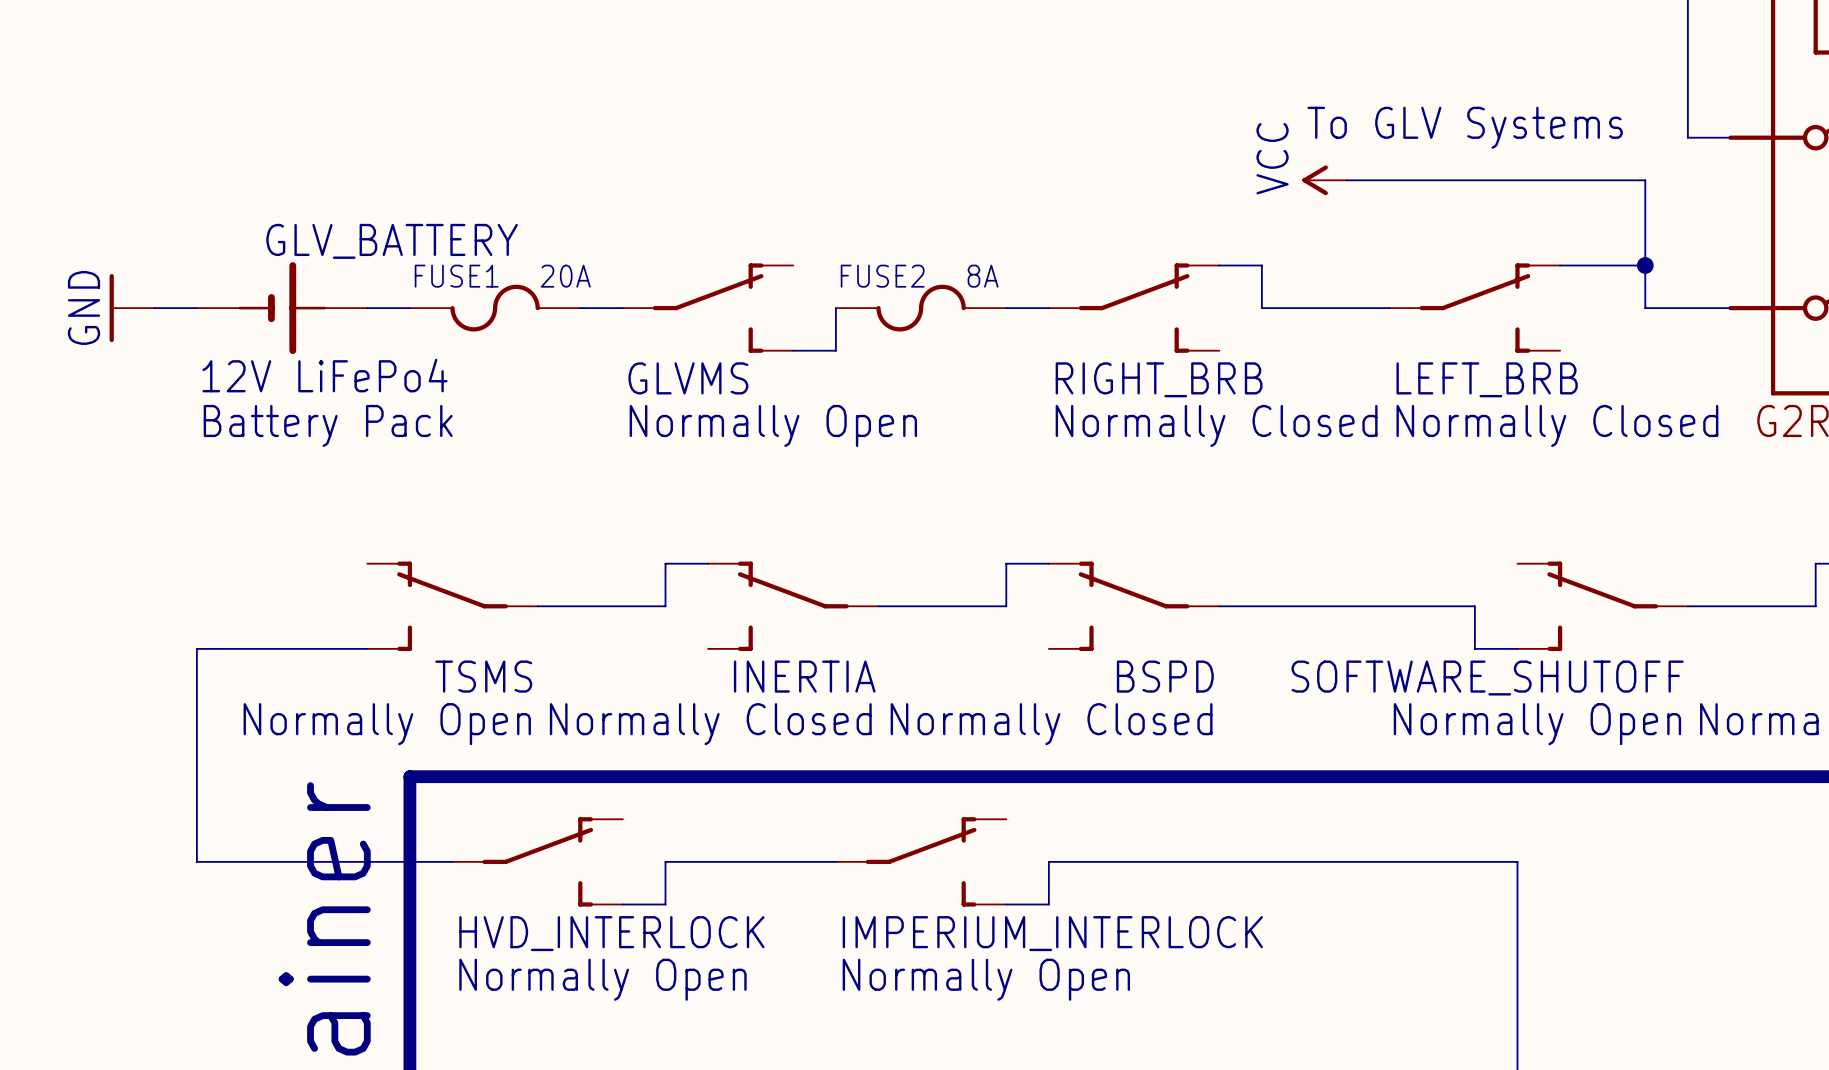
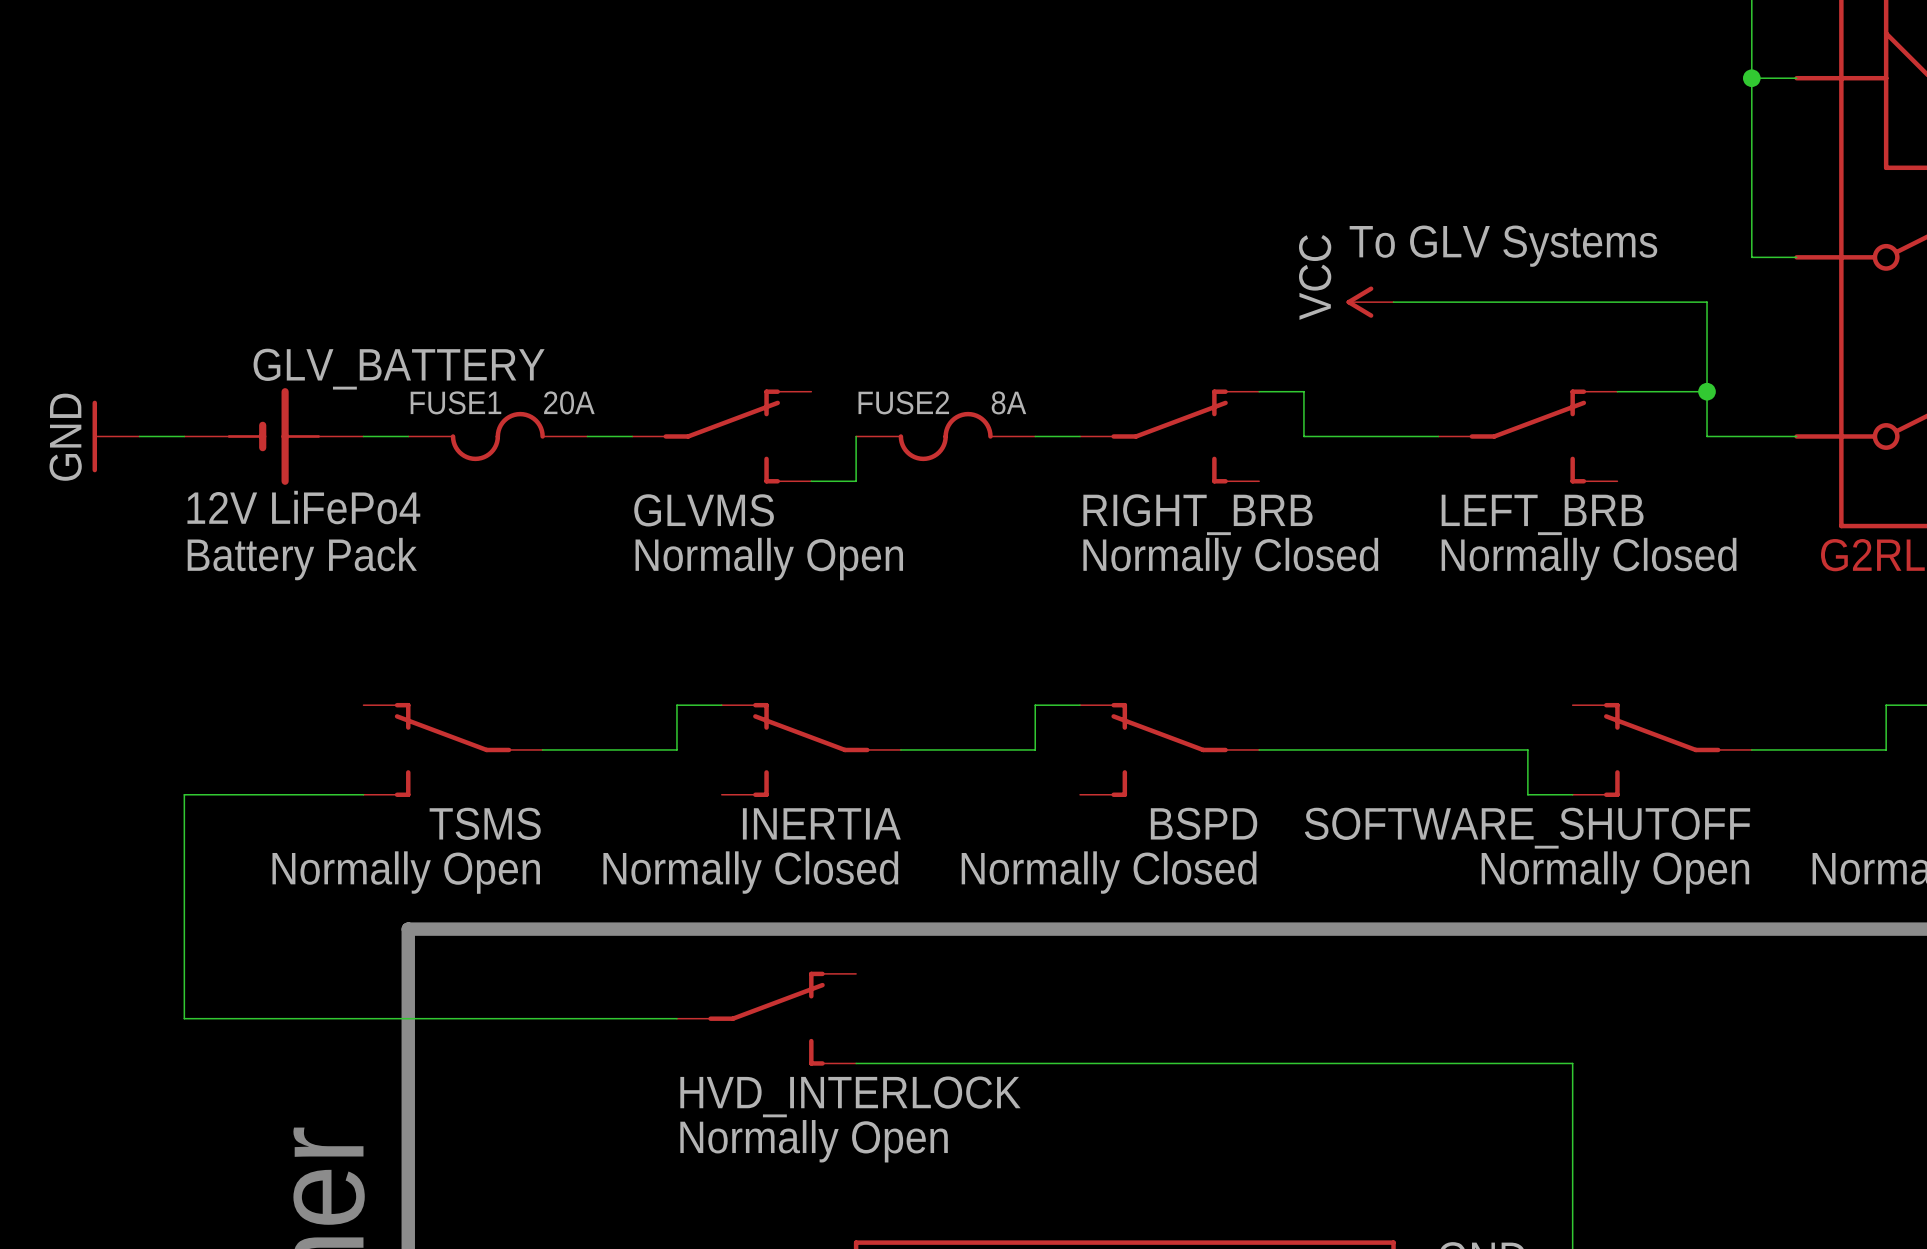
wire: none -> (453, 1018) (676, 1018)
HVD_INTERLOCK position: (537, 861) -> (766, 1018)
wire: (835, 861) (665, 861) (665, 904) (622, 904) -> none
IMPERIUM_INTERLOCK: Normally Open (921, 861) -> none
wire: none -> (856, 1063) (1035, 1063)
wire: (1048, 904) (1048, 861) (1517, 861) (1517, 904) -> (1080, 1063) (1572, 1063)

